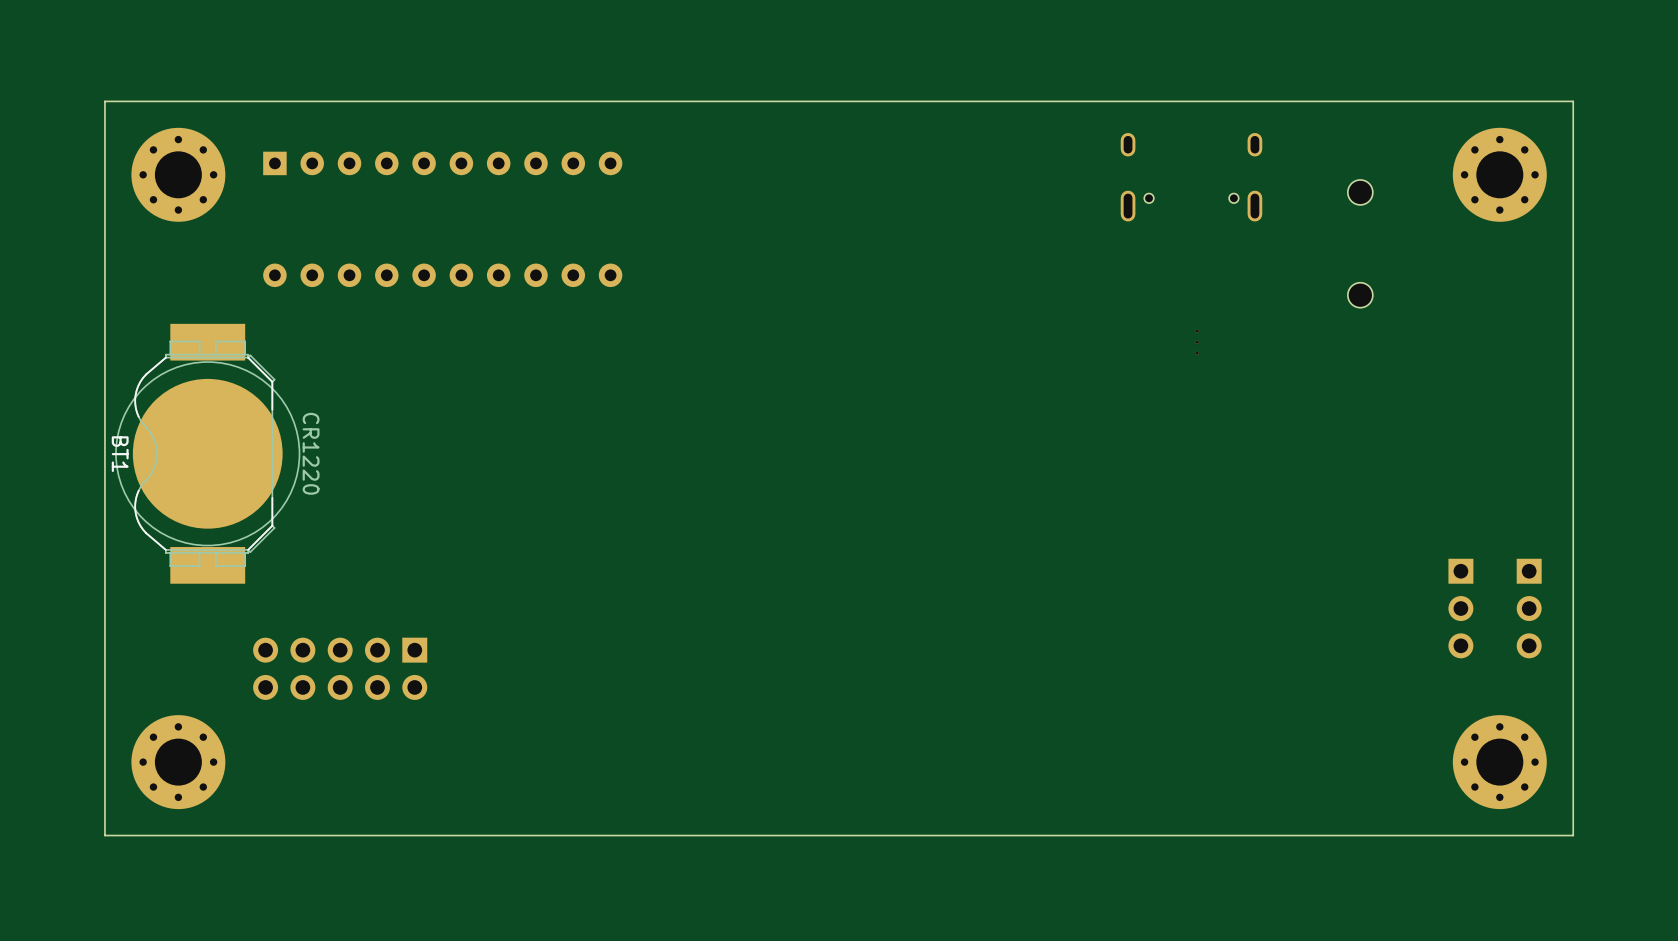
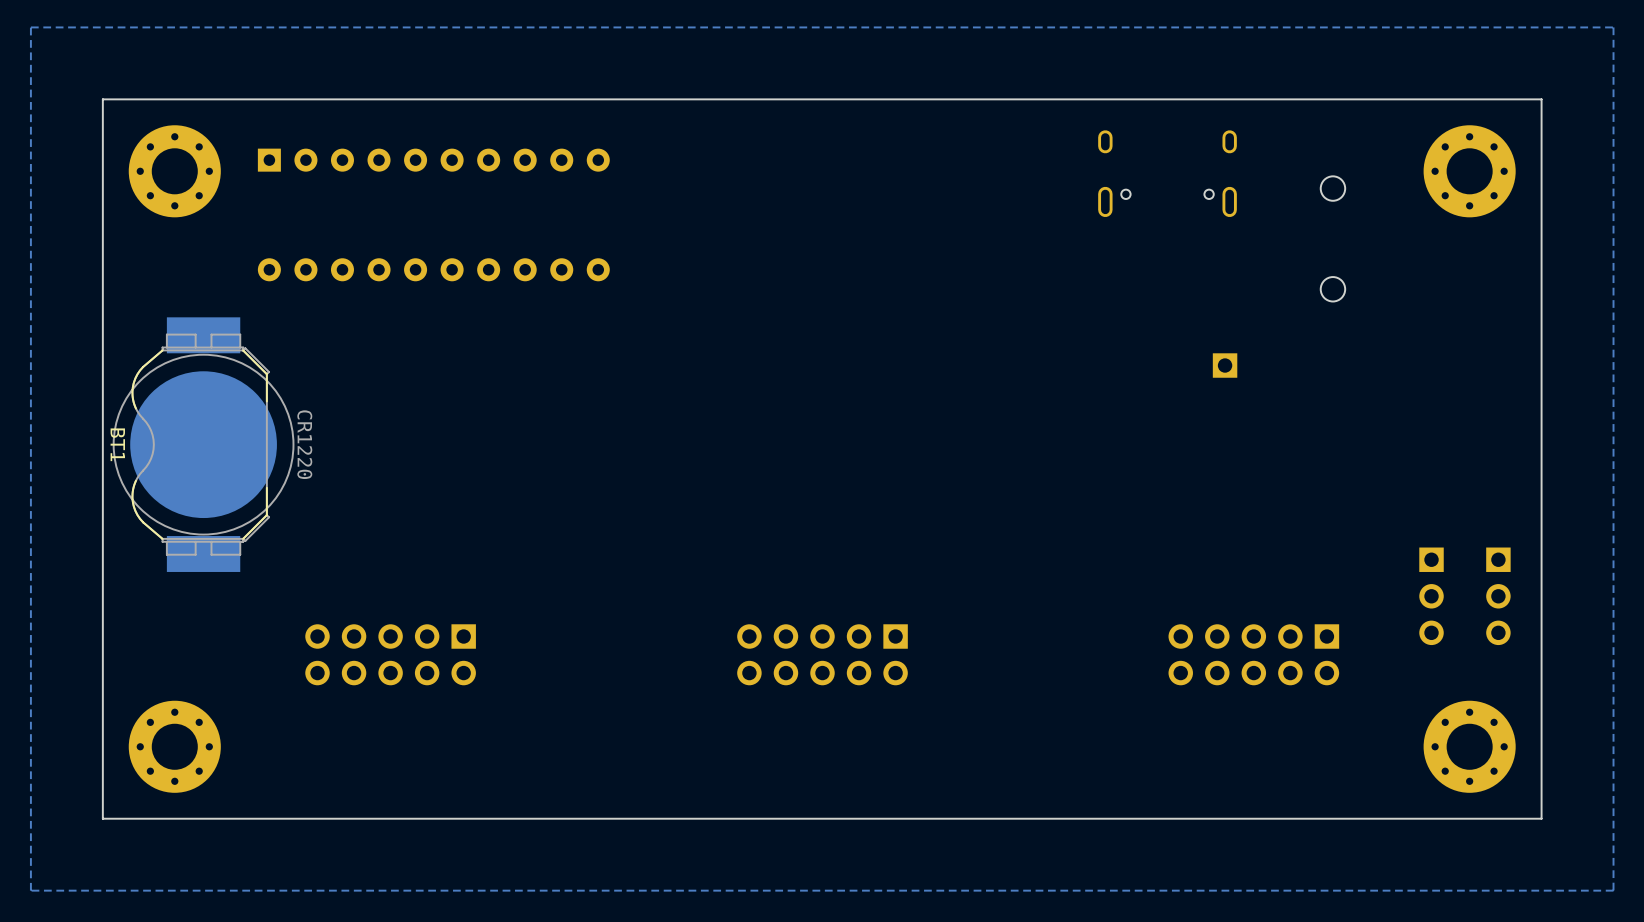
zone outline: none -> (1613, 27) (1613, 890) (30, 890) (30, 27) (1613, 27)
part: (1197, 342) -> none
part: none -> (1225, 365)
part position: (340, 668) -> (390, 654)
part: none -> (822, 654)
part: none -> (1253, 654)

